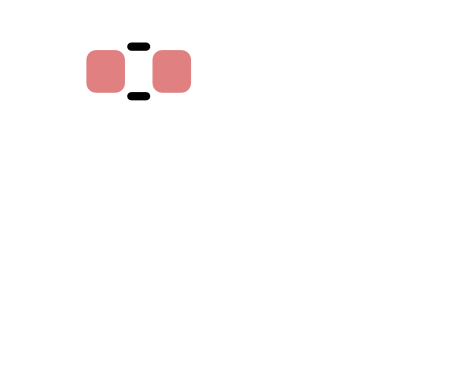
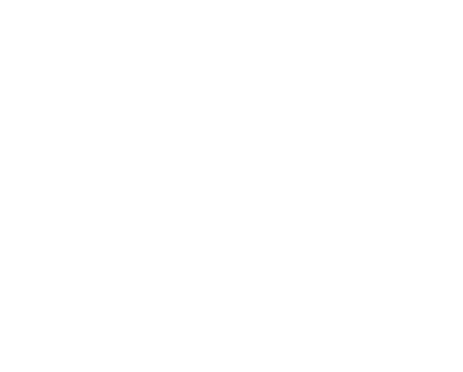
part: (138, 71) -> none

